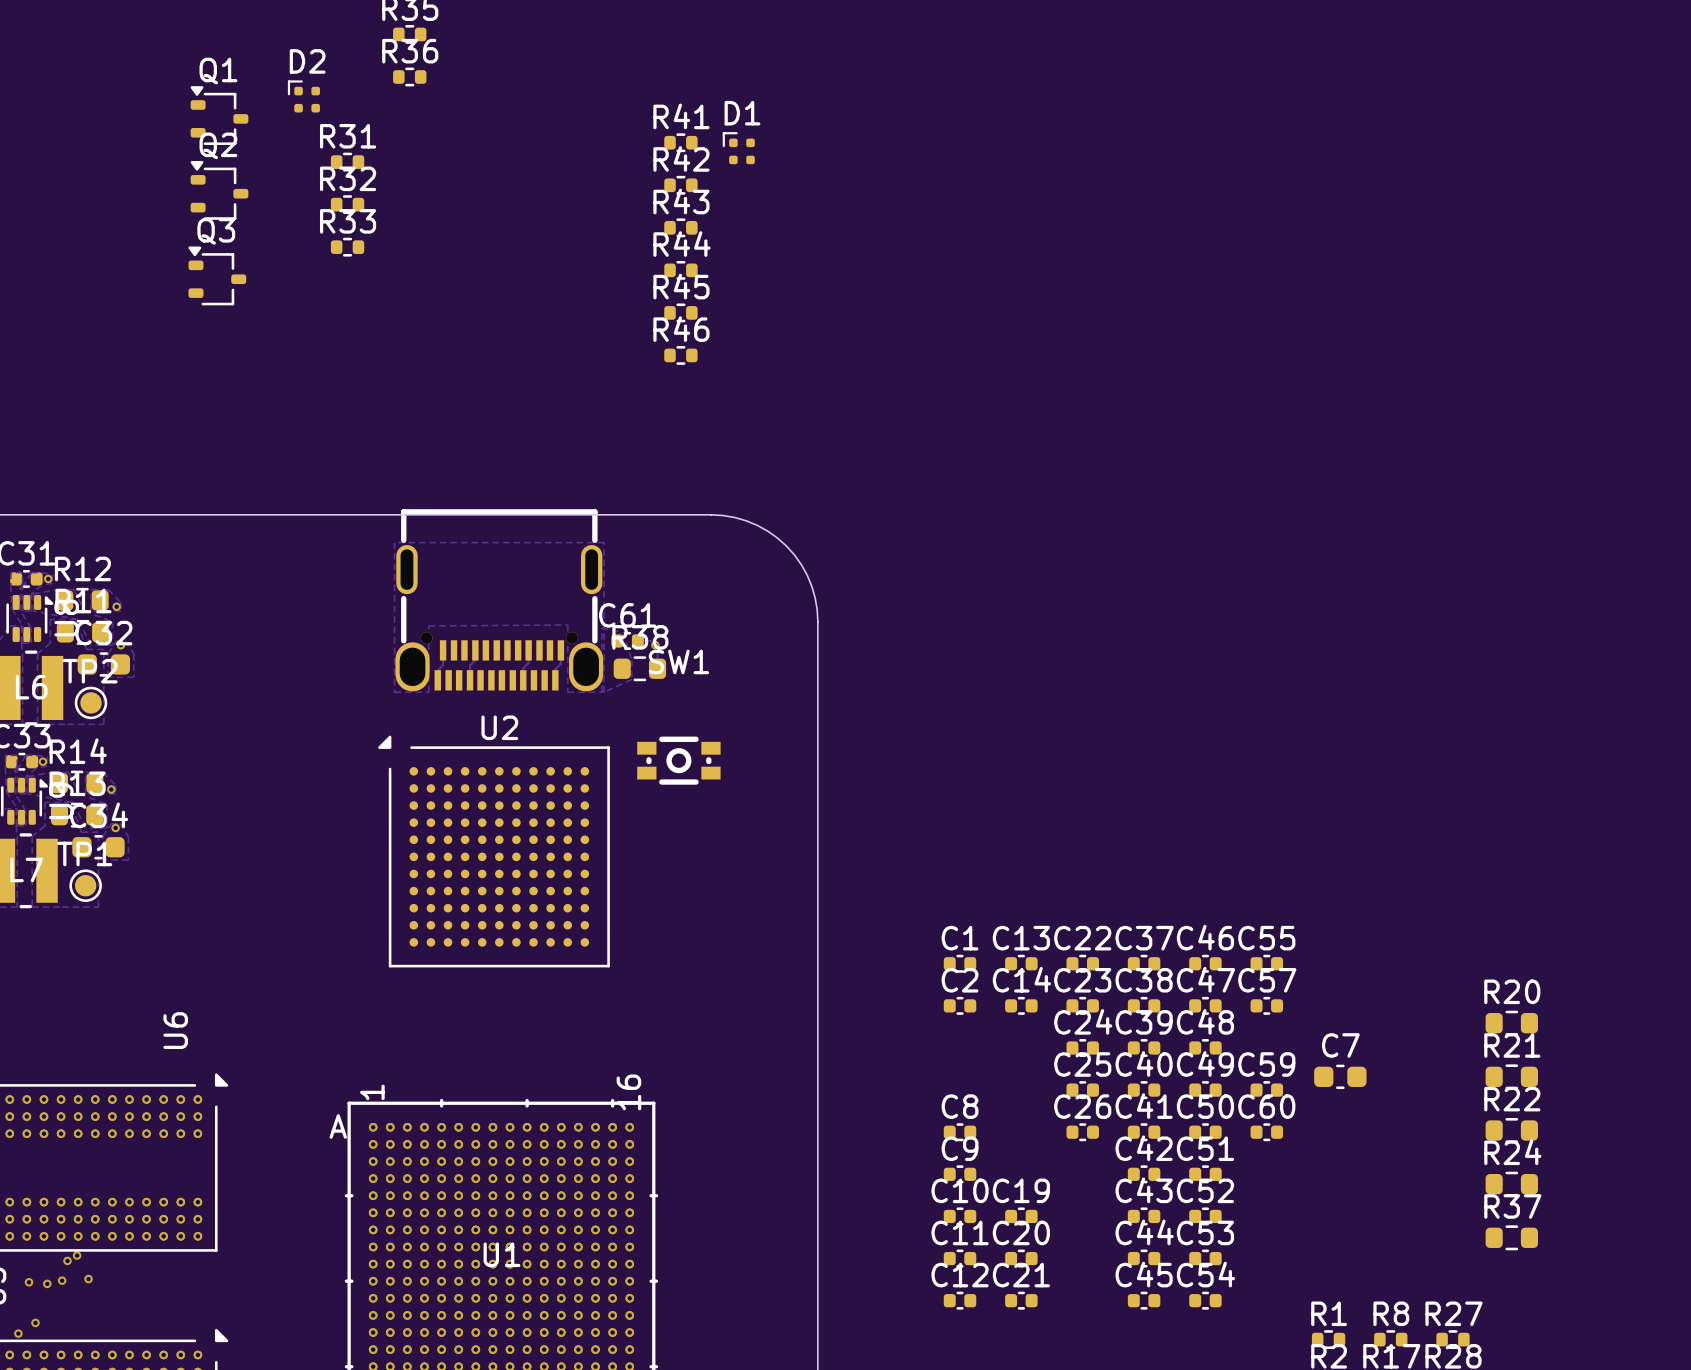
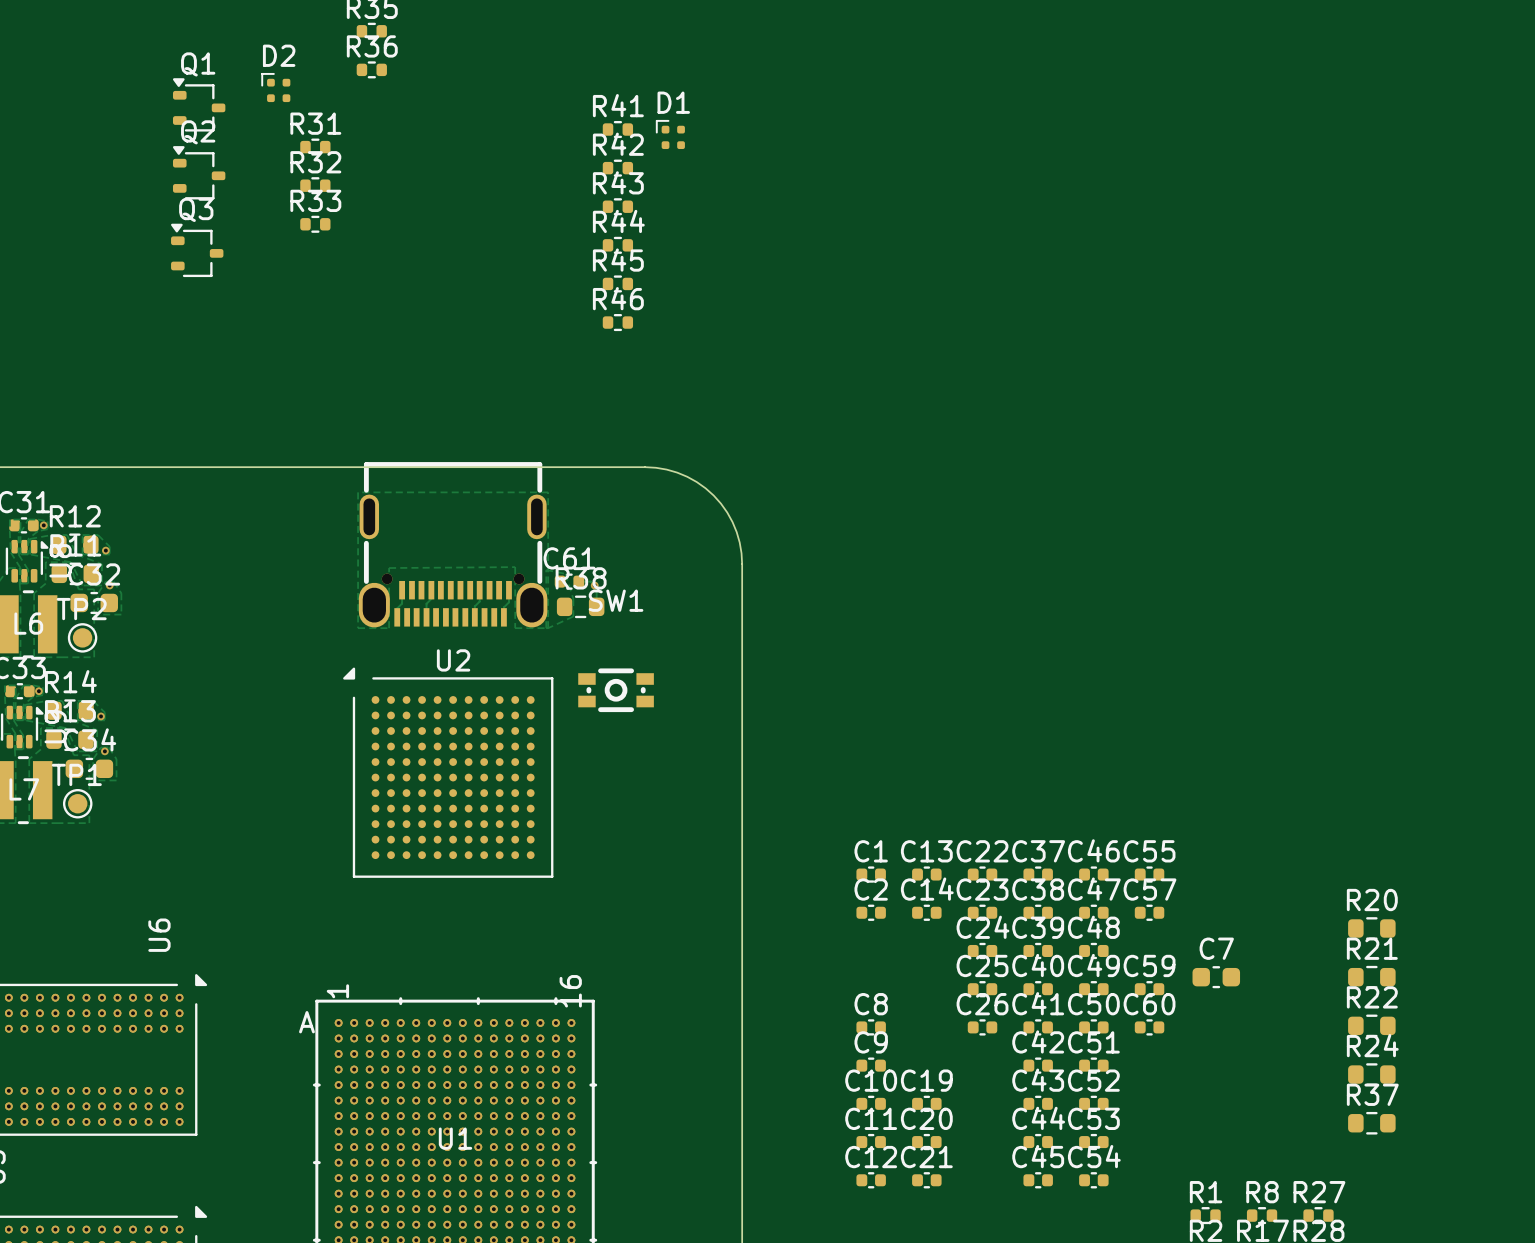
via: (77, 1255) -> none
via: (67, 1260) -> none
via: (88, 1279) -> none
via: (62, 1280) -> none
via: (29, 1282) -> none
via: (47, 1283) -> none
via: (35, 1322) -> none
via: (18, 1333) -> none

